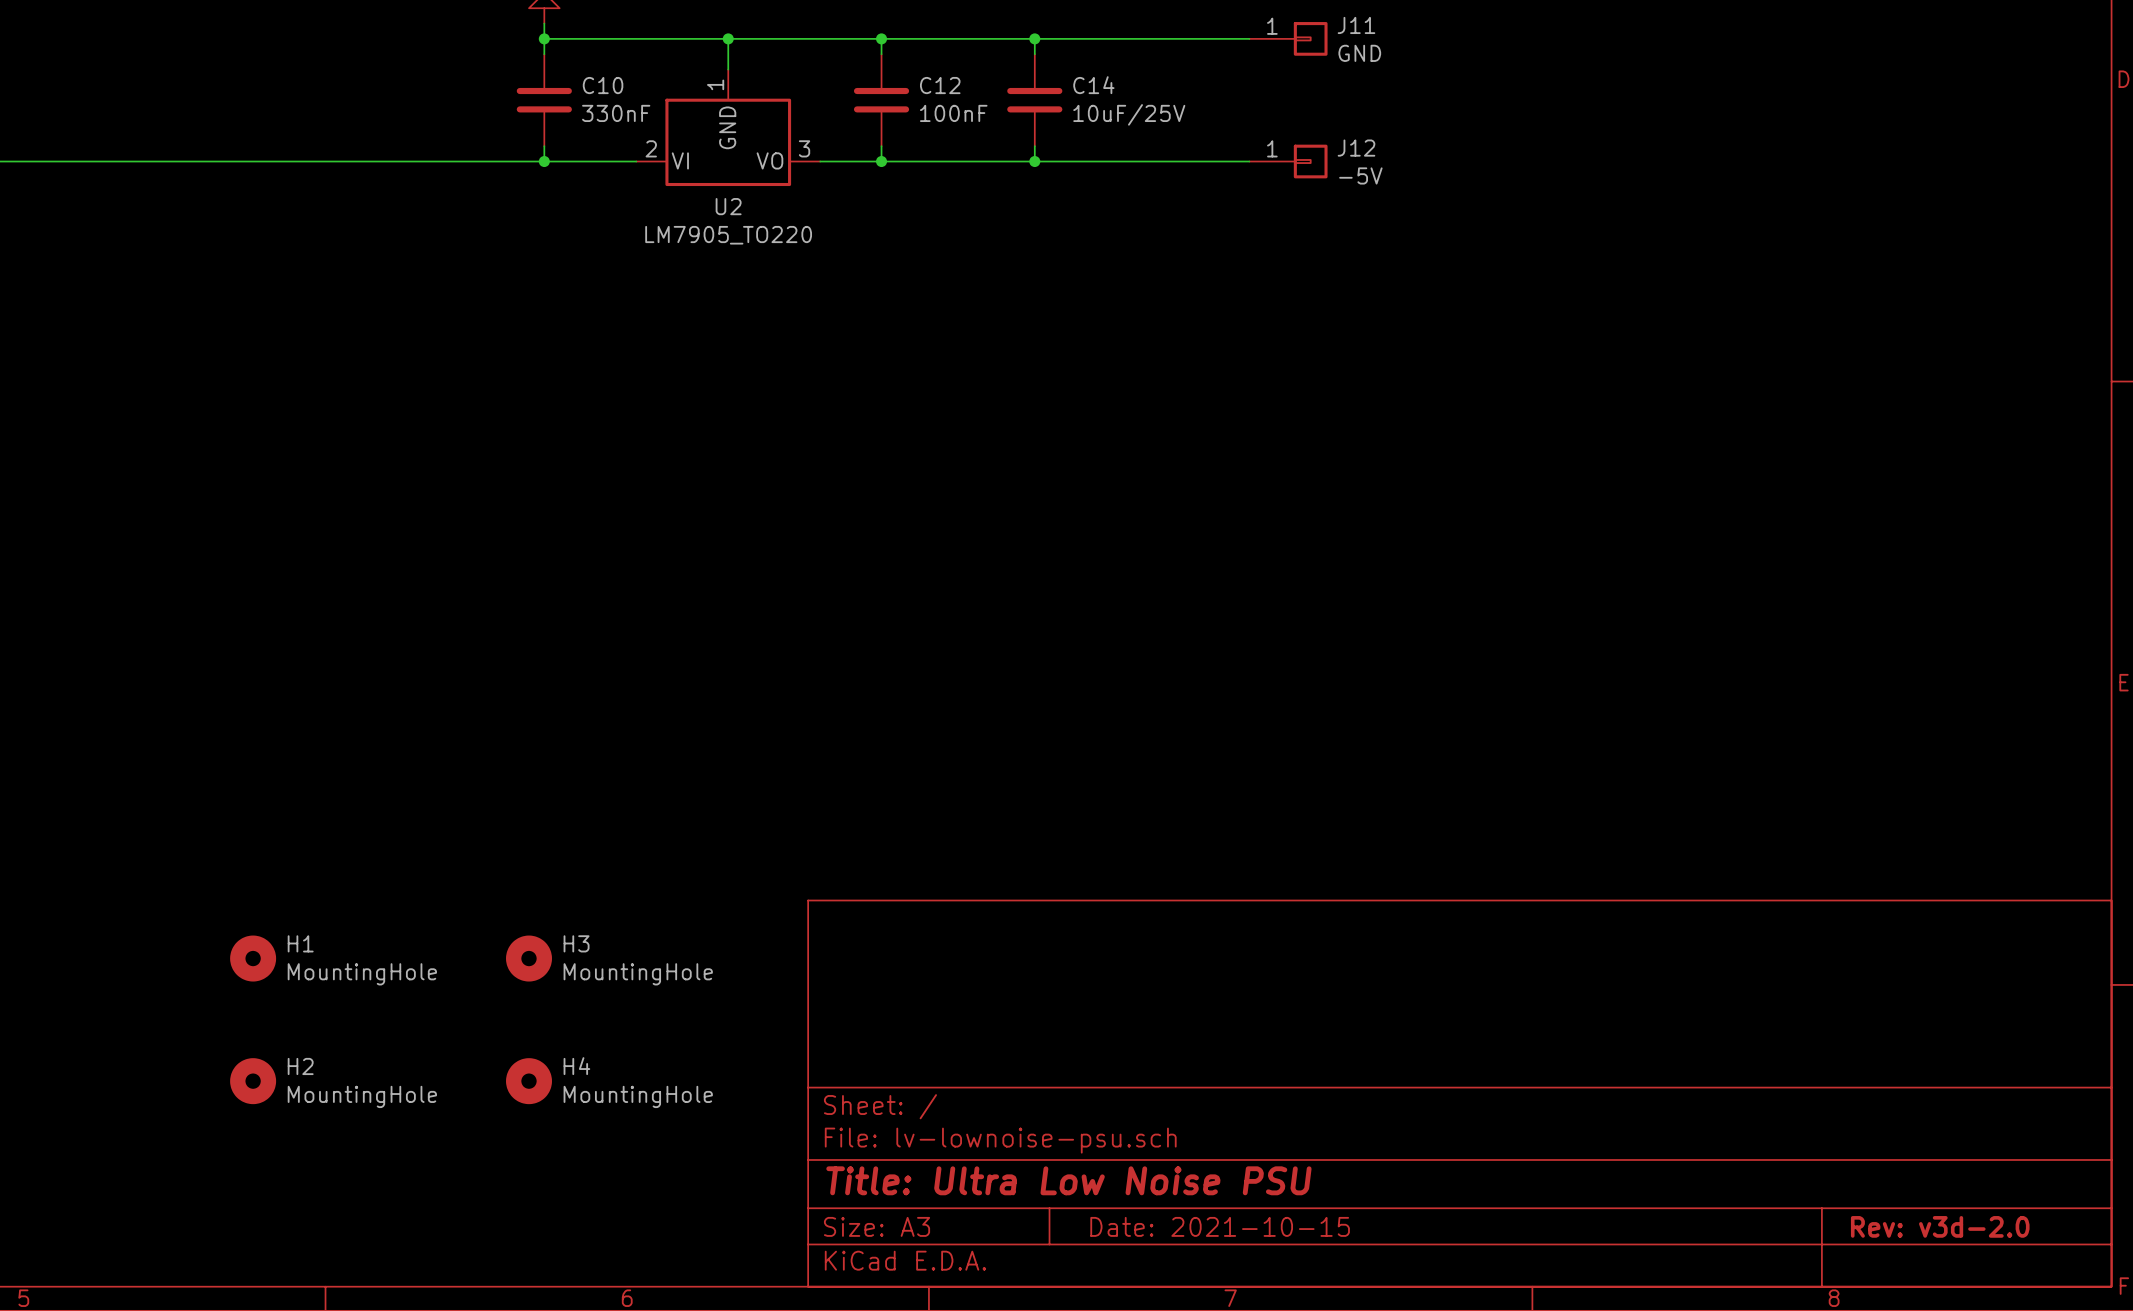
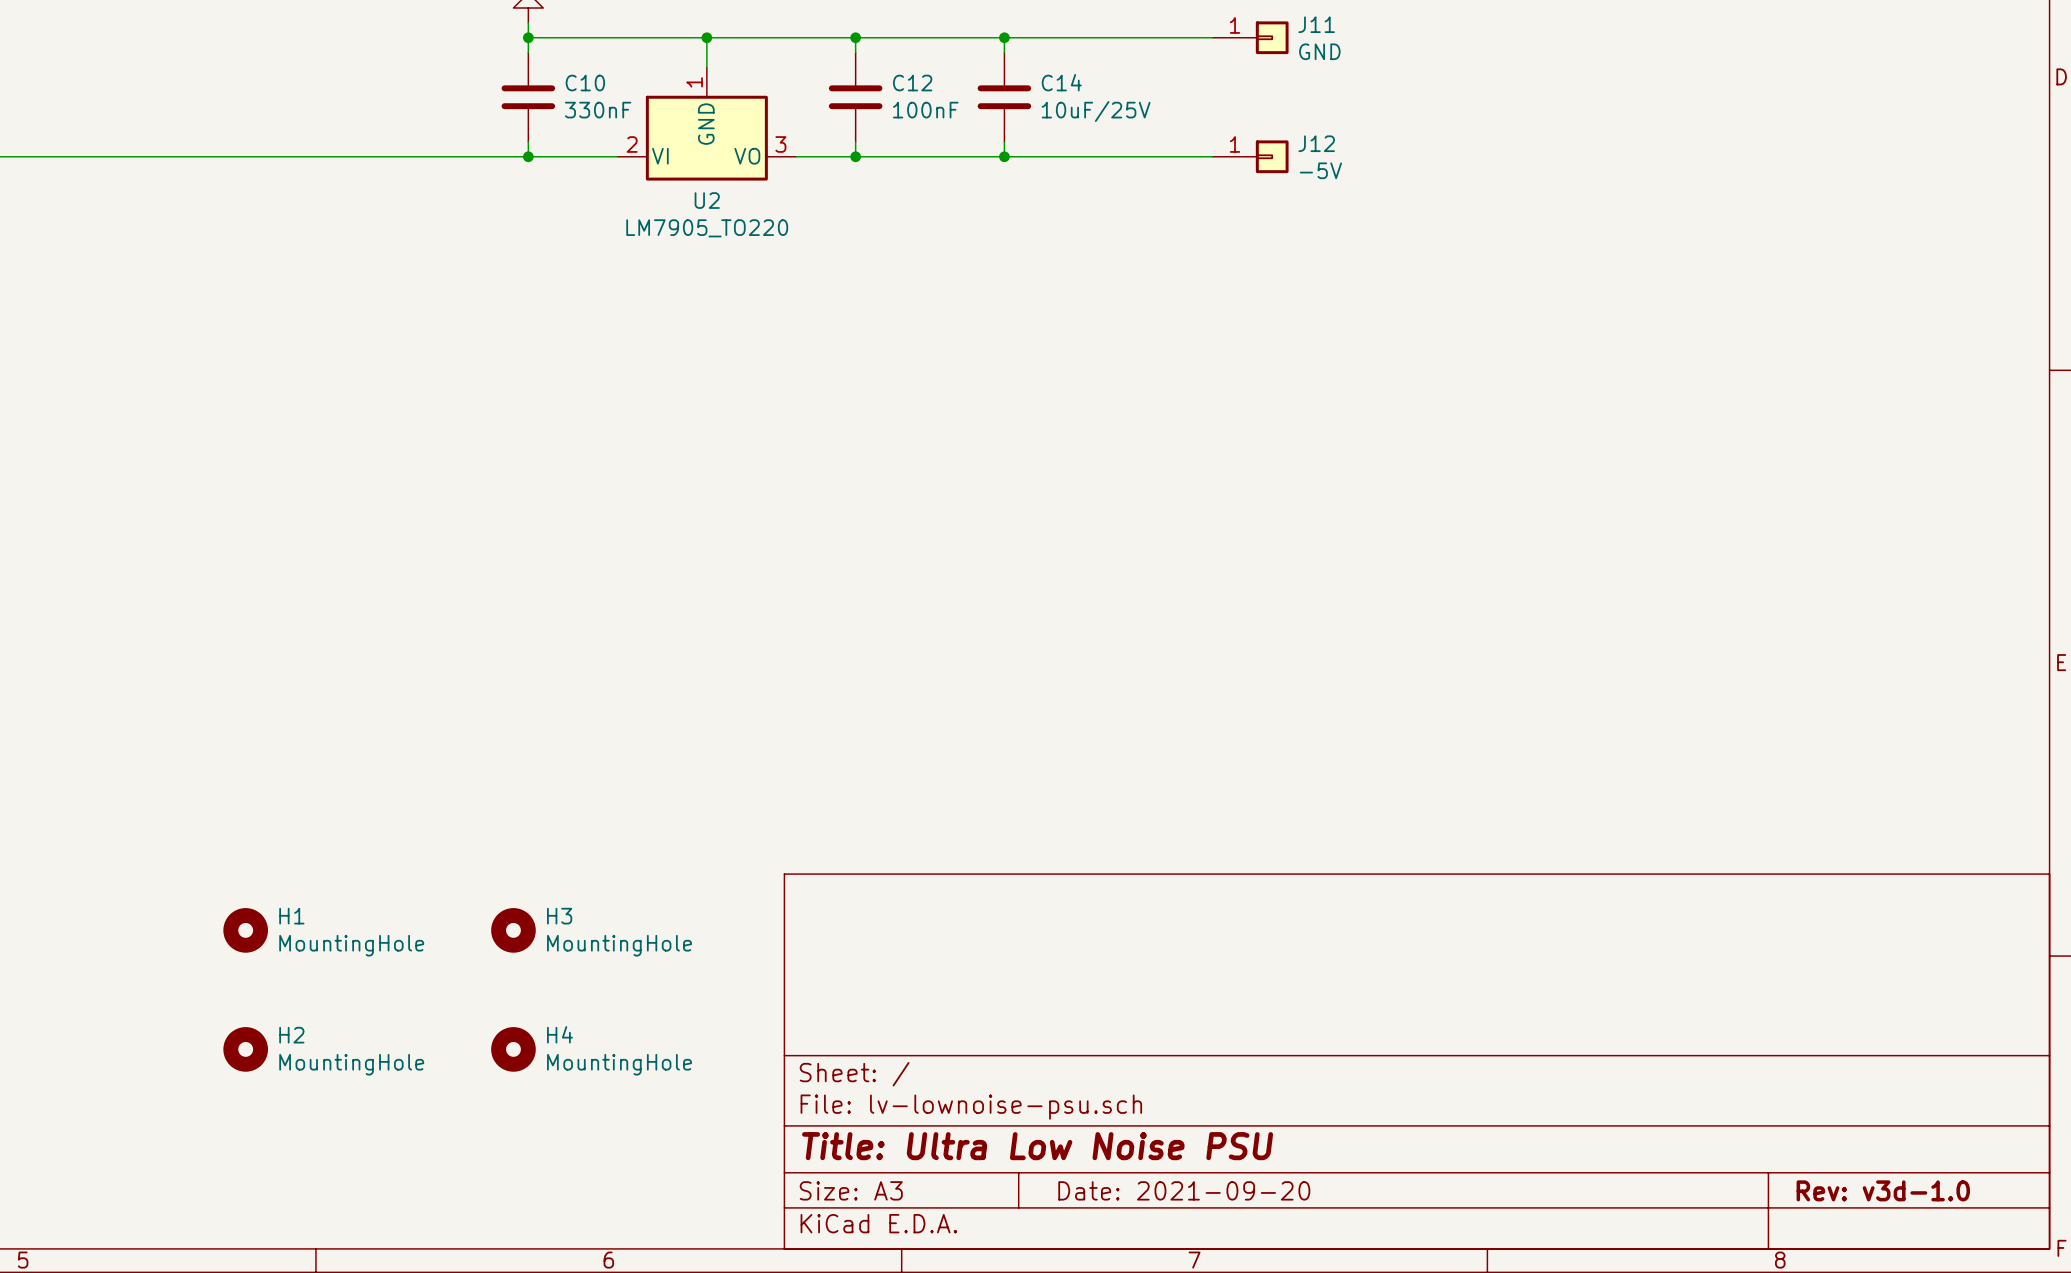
title block: Date: 2021-10-15 (1220, 1226) -> Date: 2021-09-20 (1184, 1190)
title block: Rev: v3d-2.0 (1940, 1226) -> Rev: v3d-1.0 (1883, 1190)

